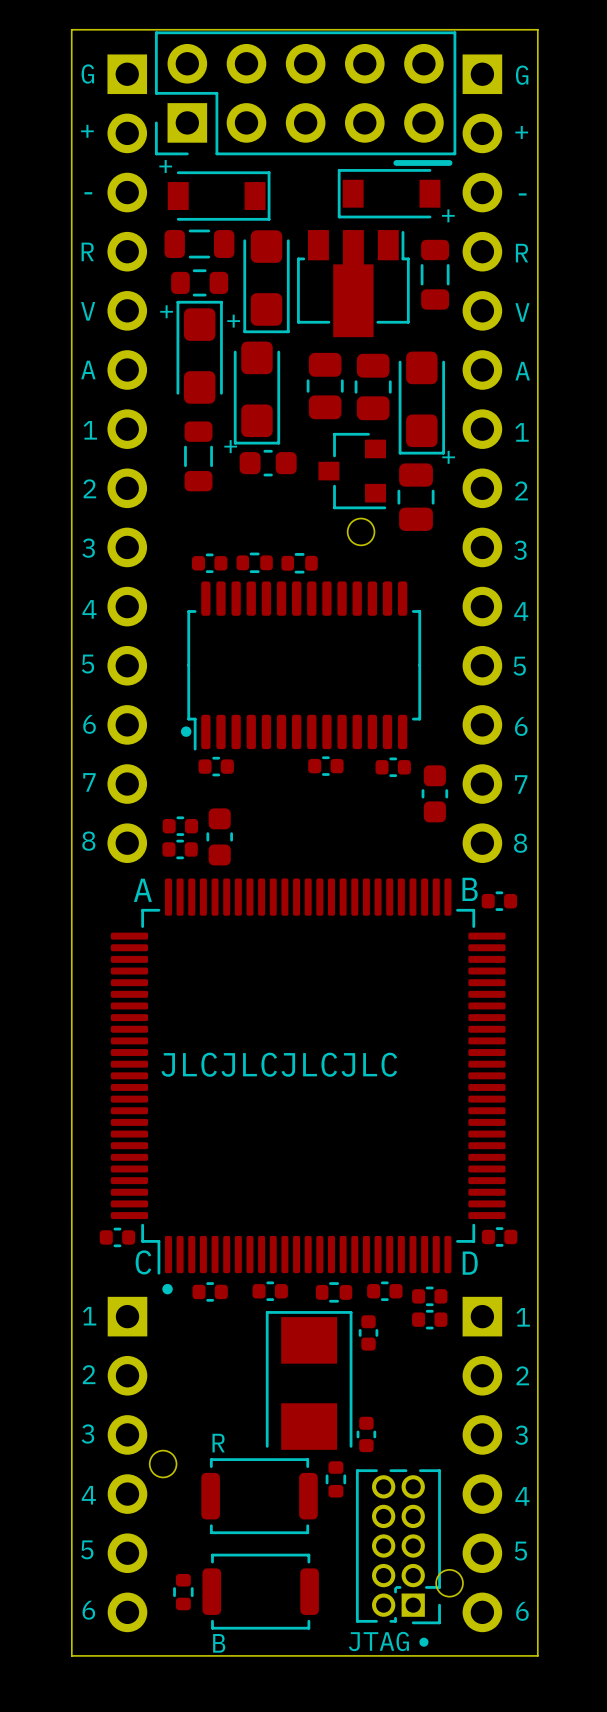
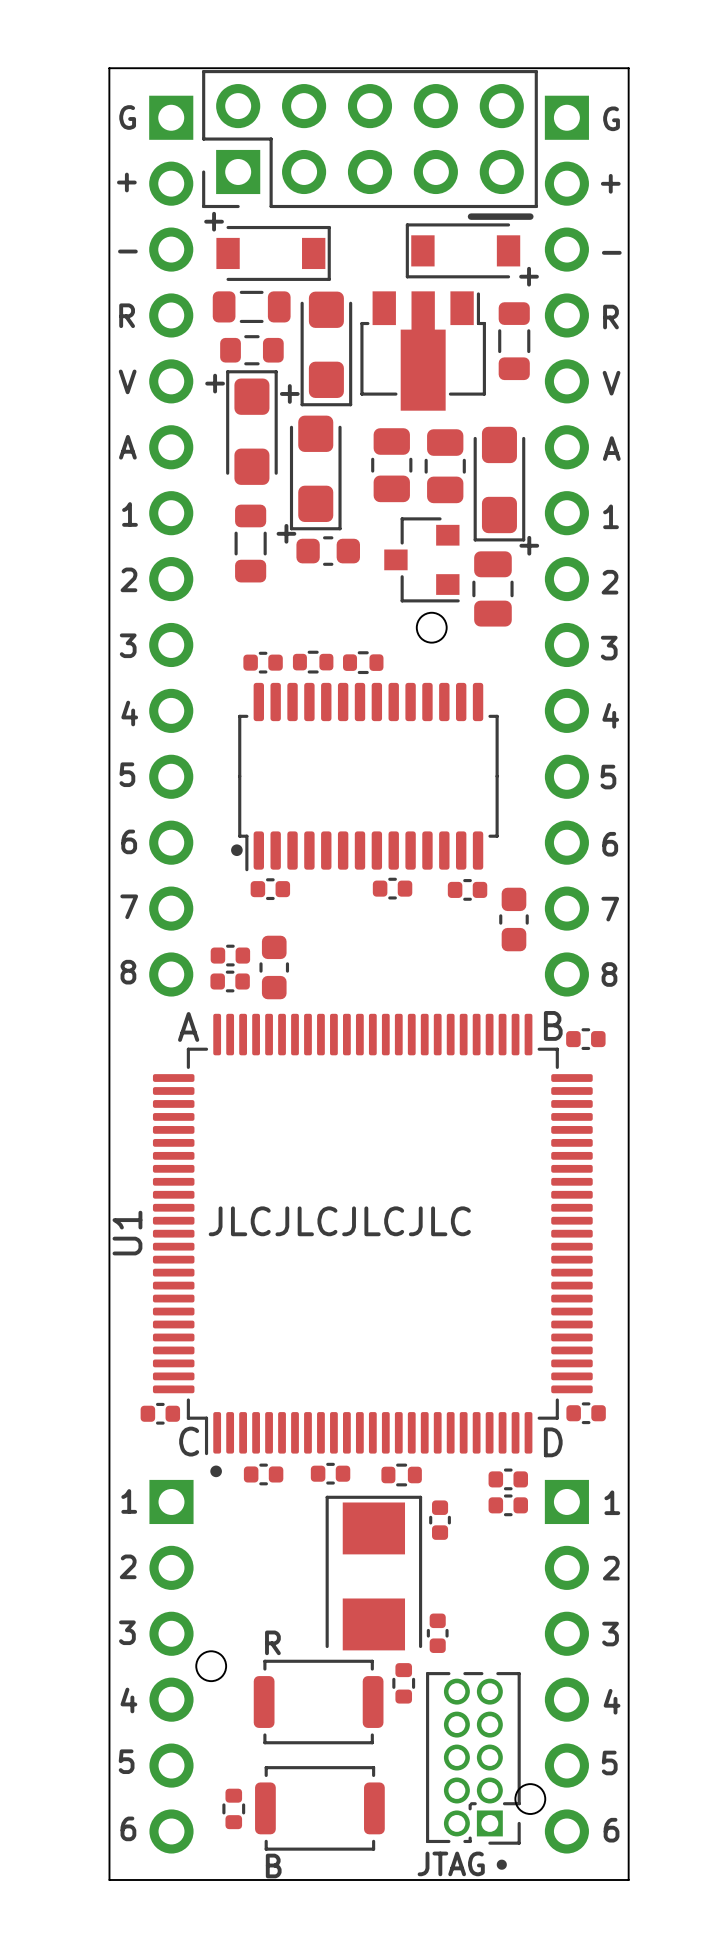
U1 name: none -> U1 (127, 1233)
part: (384, 1291) -> none

